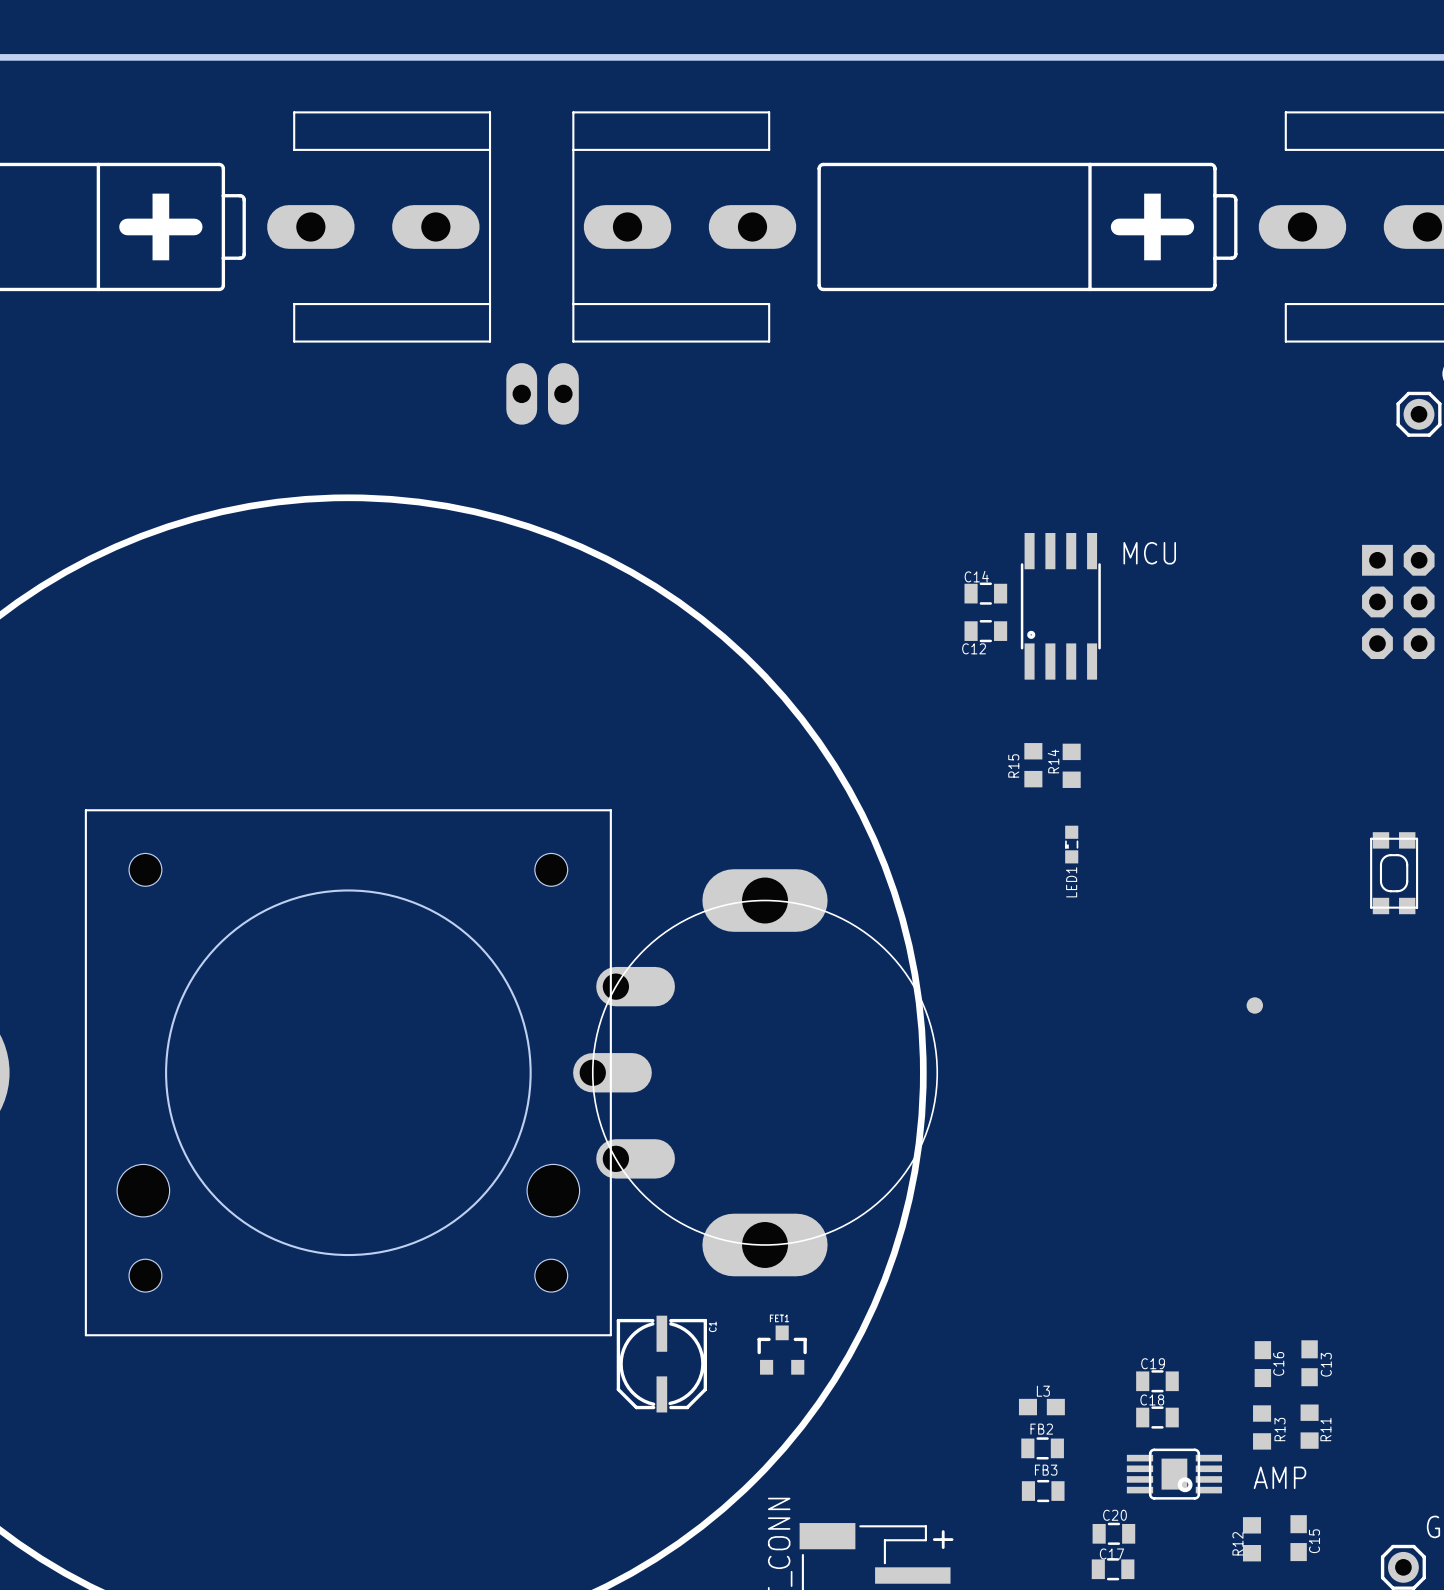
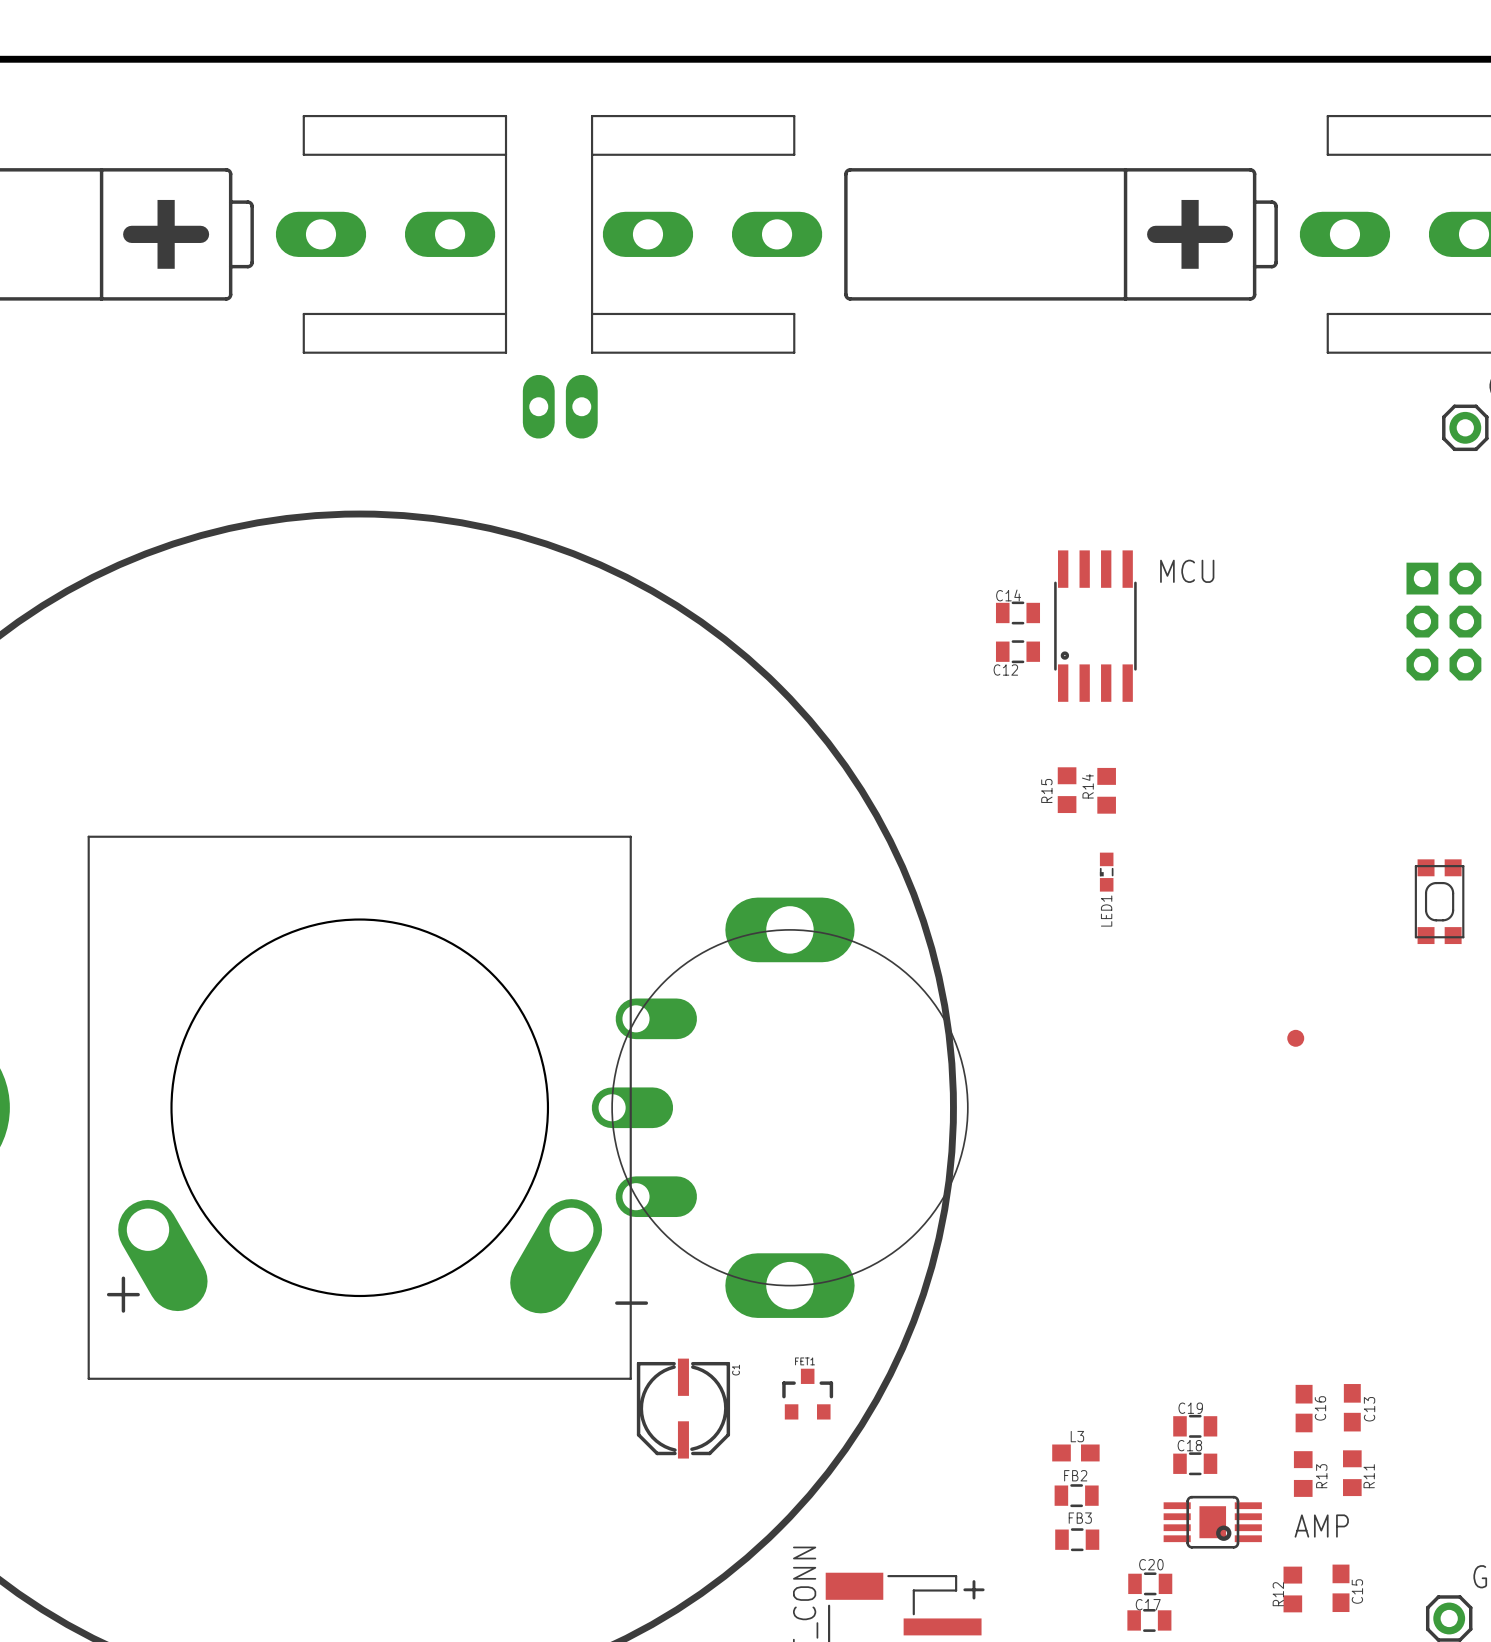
part footprint: [84, 809, 612, 1337] -> [87, 835, 632, 1380]

